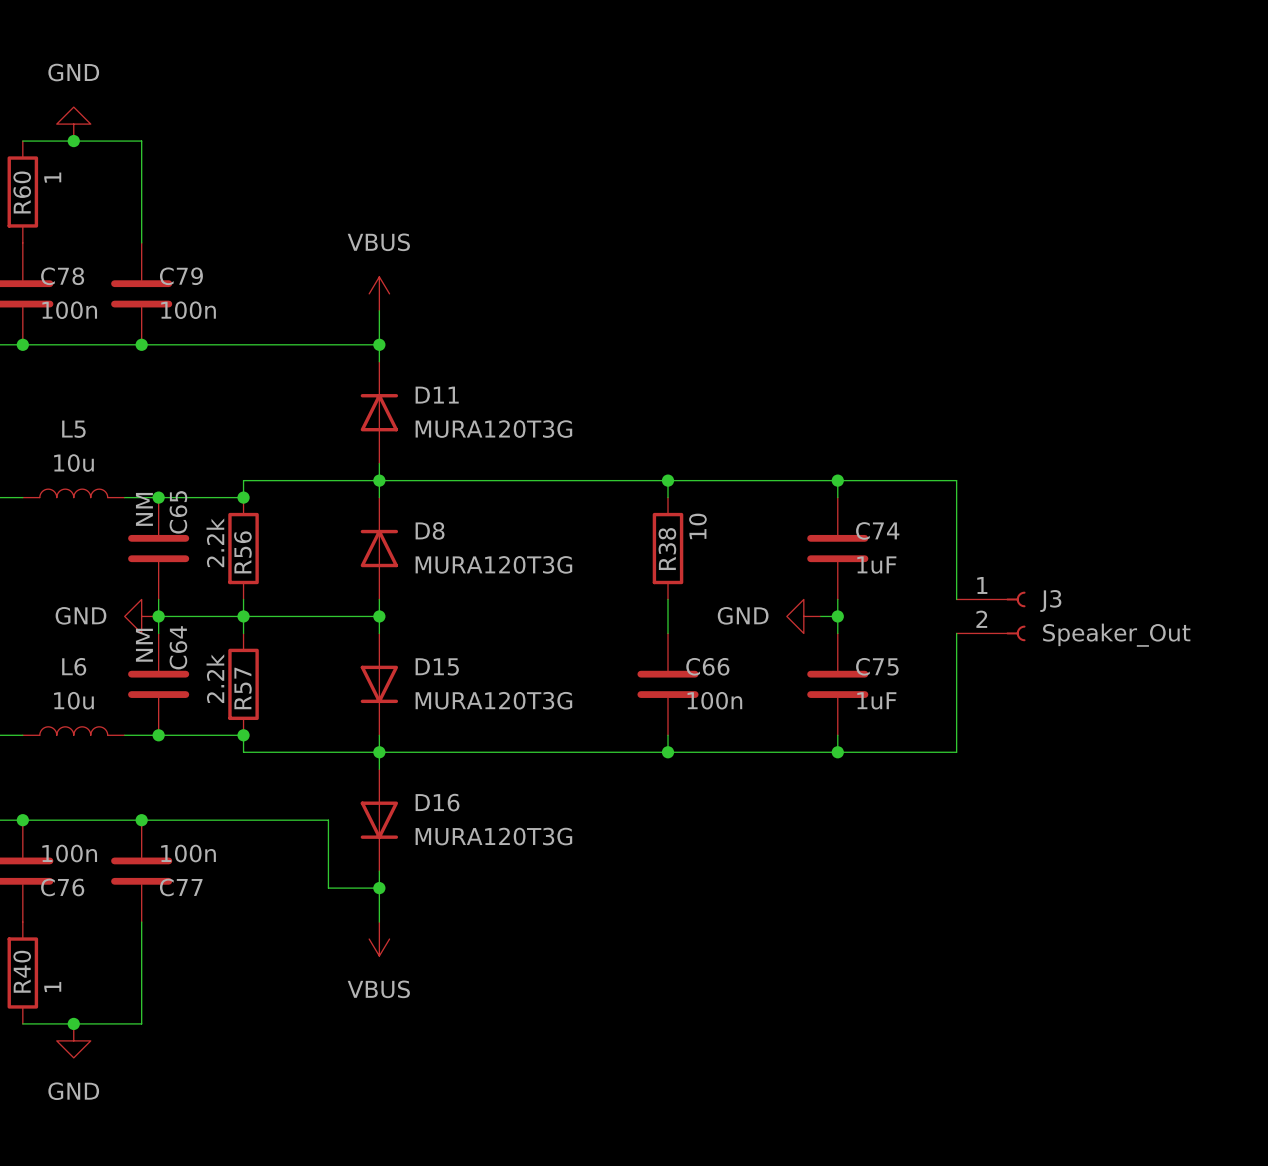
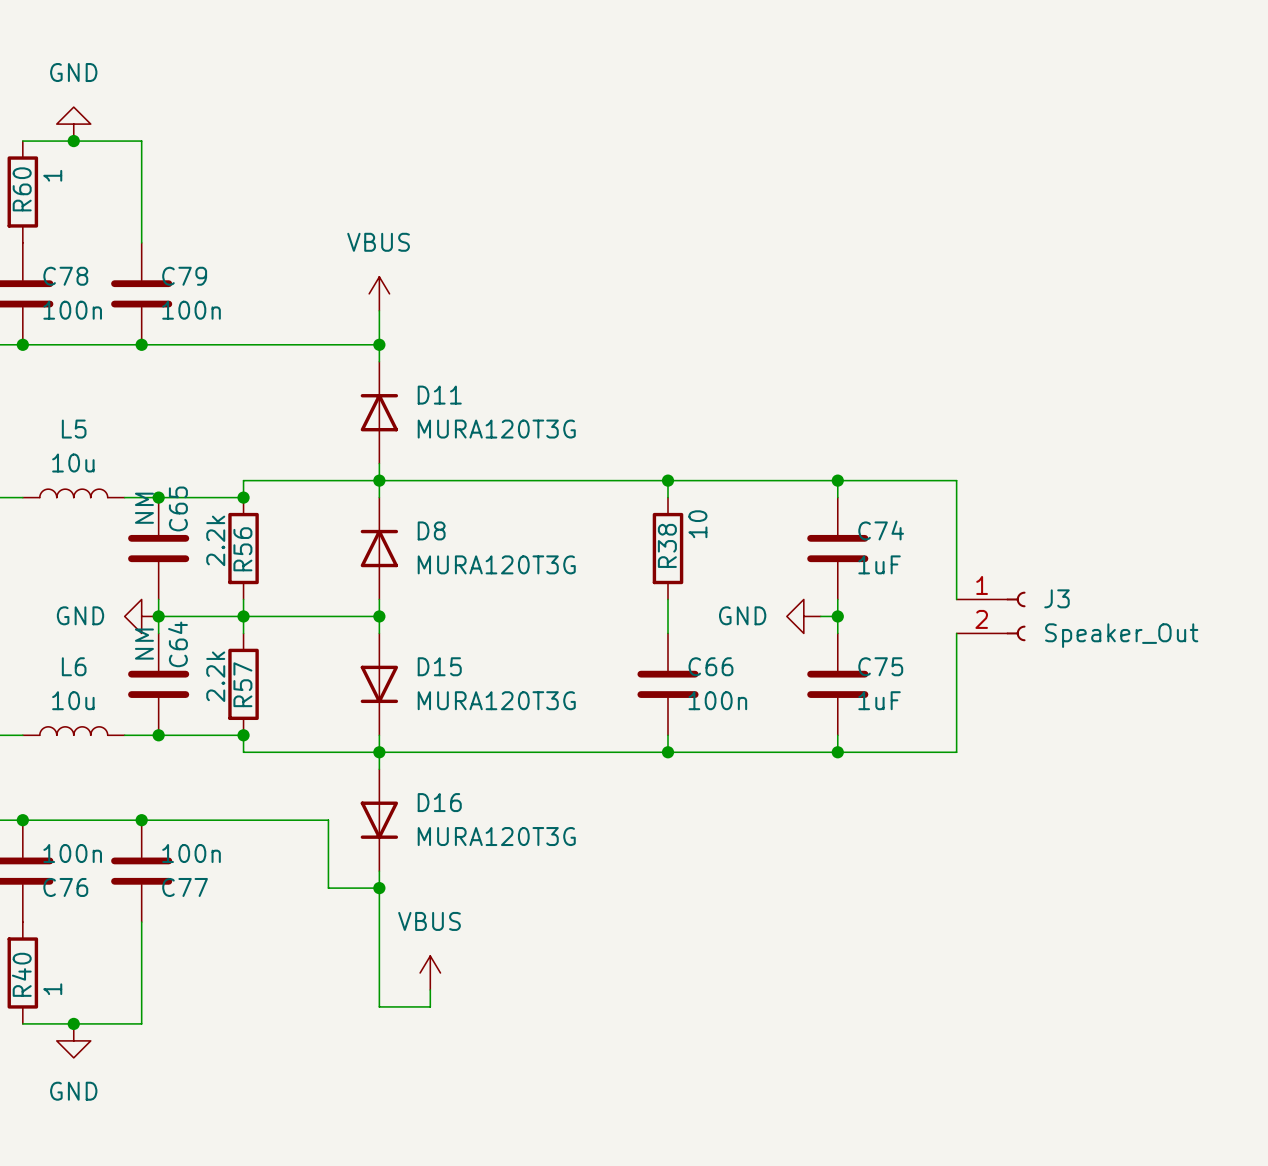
wire: none -> (379, 922) (379, 1006) (430, 1006) (430, 989)
power symbol rotation: 0° (379, 939) -> 180° (430, 972)
power symbol position: VBUS (379, 939) -> VBUS (430, 972)

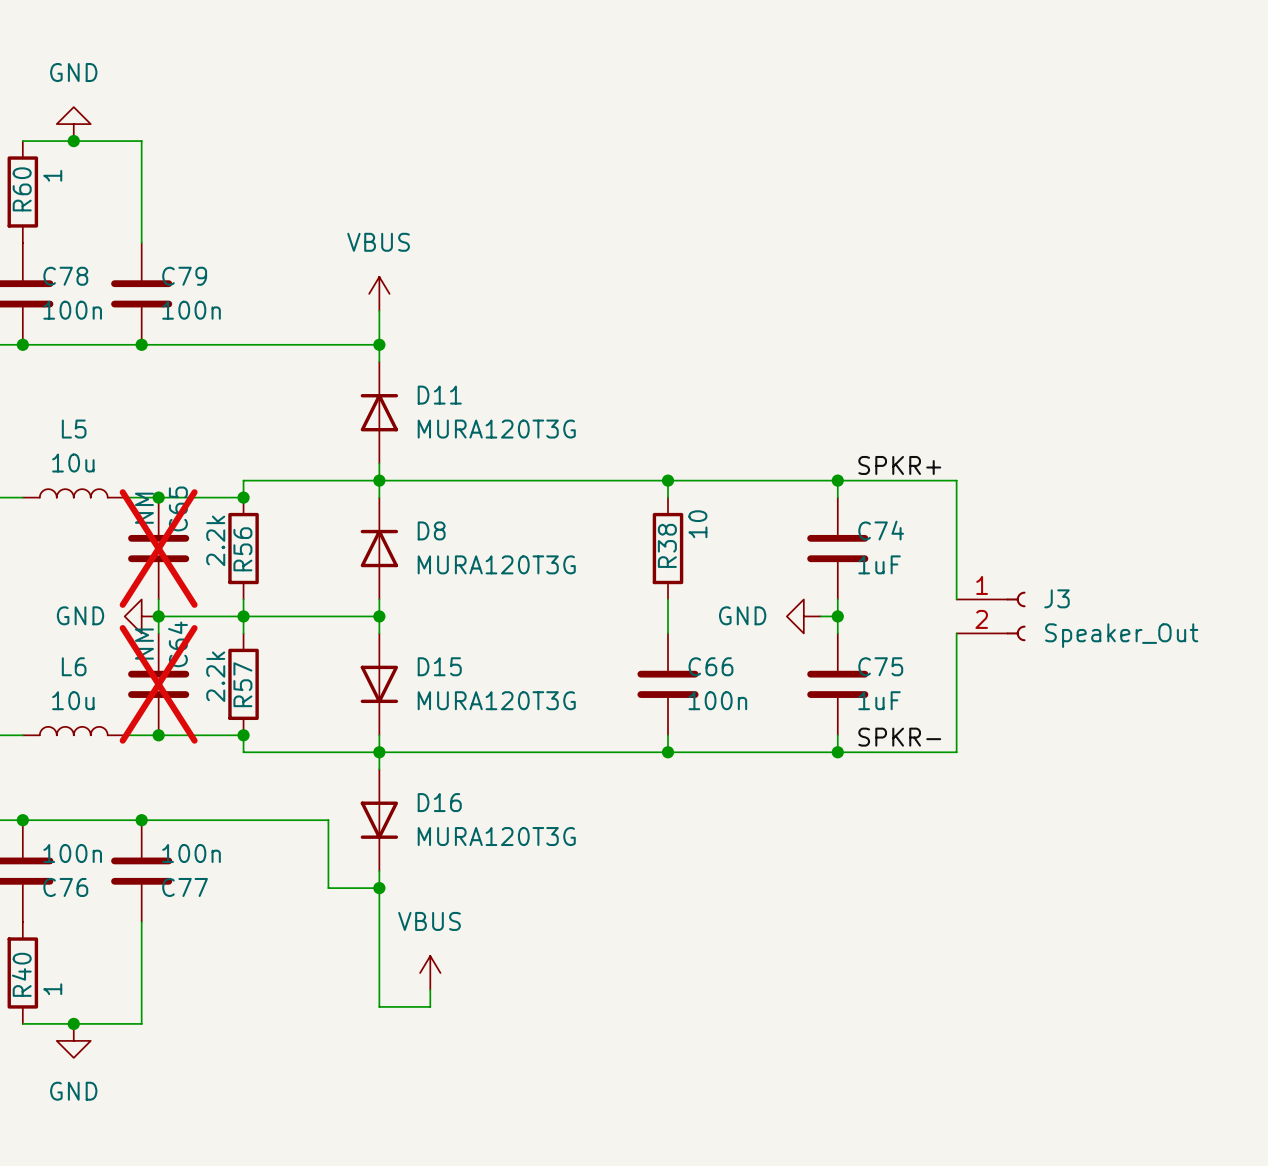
label: none -> SPKR+ (899, 465)
C65 do-not-place cross: none -> (158, 548)
C64 do-not-place cross: none -> (158, 684)
label: none -> SPKR- (899, 737)

